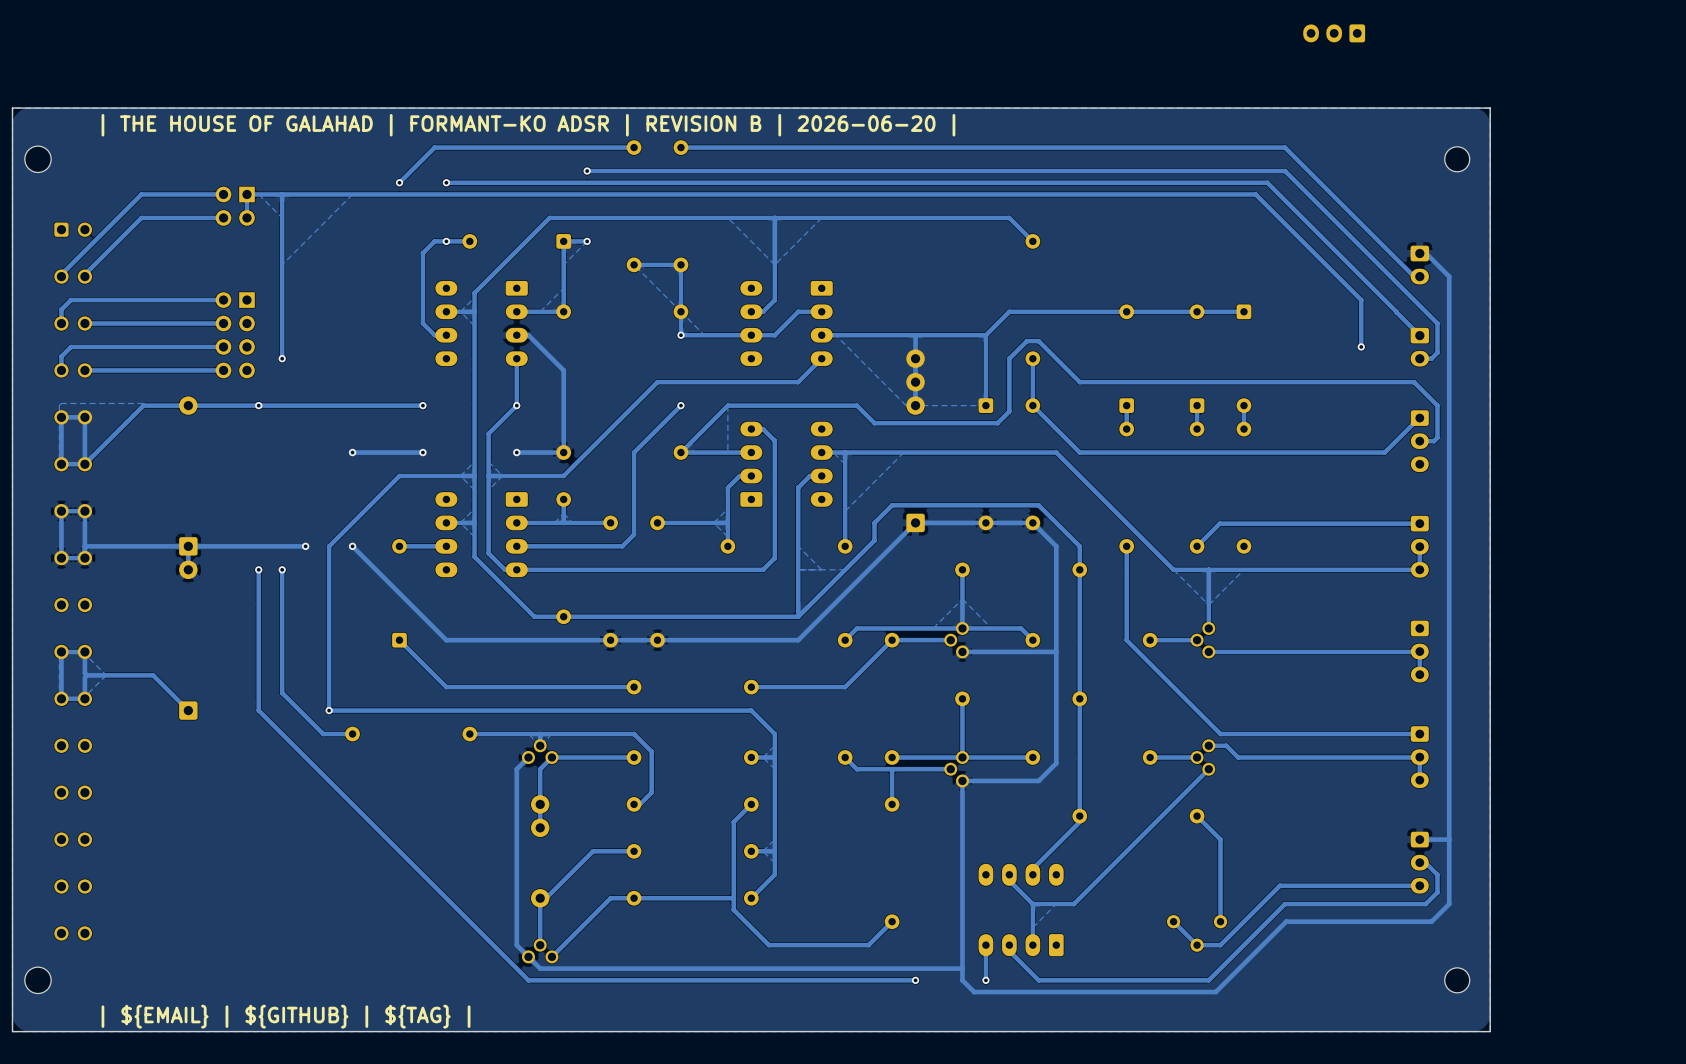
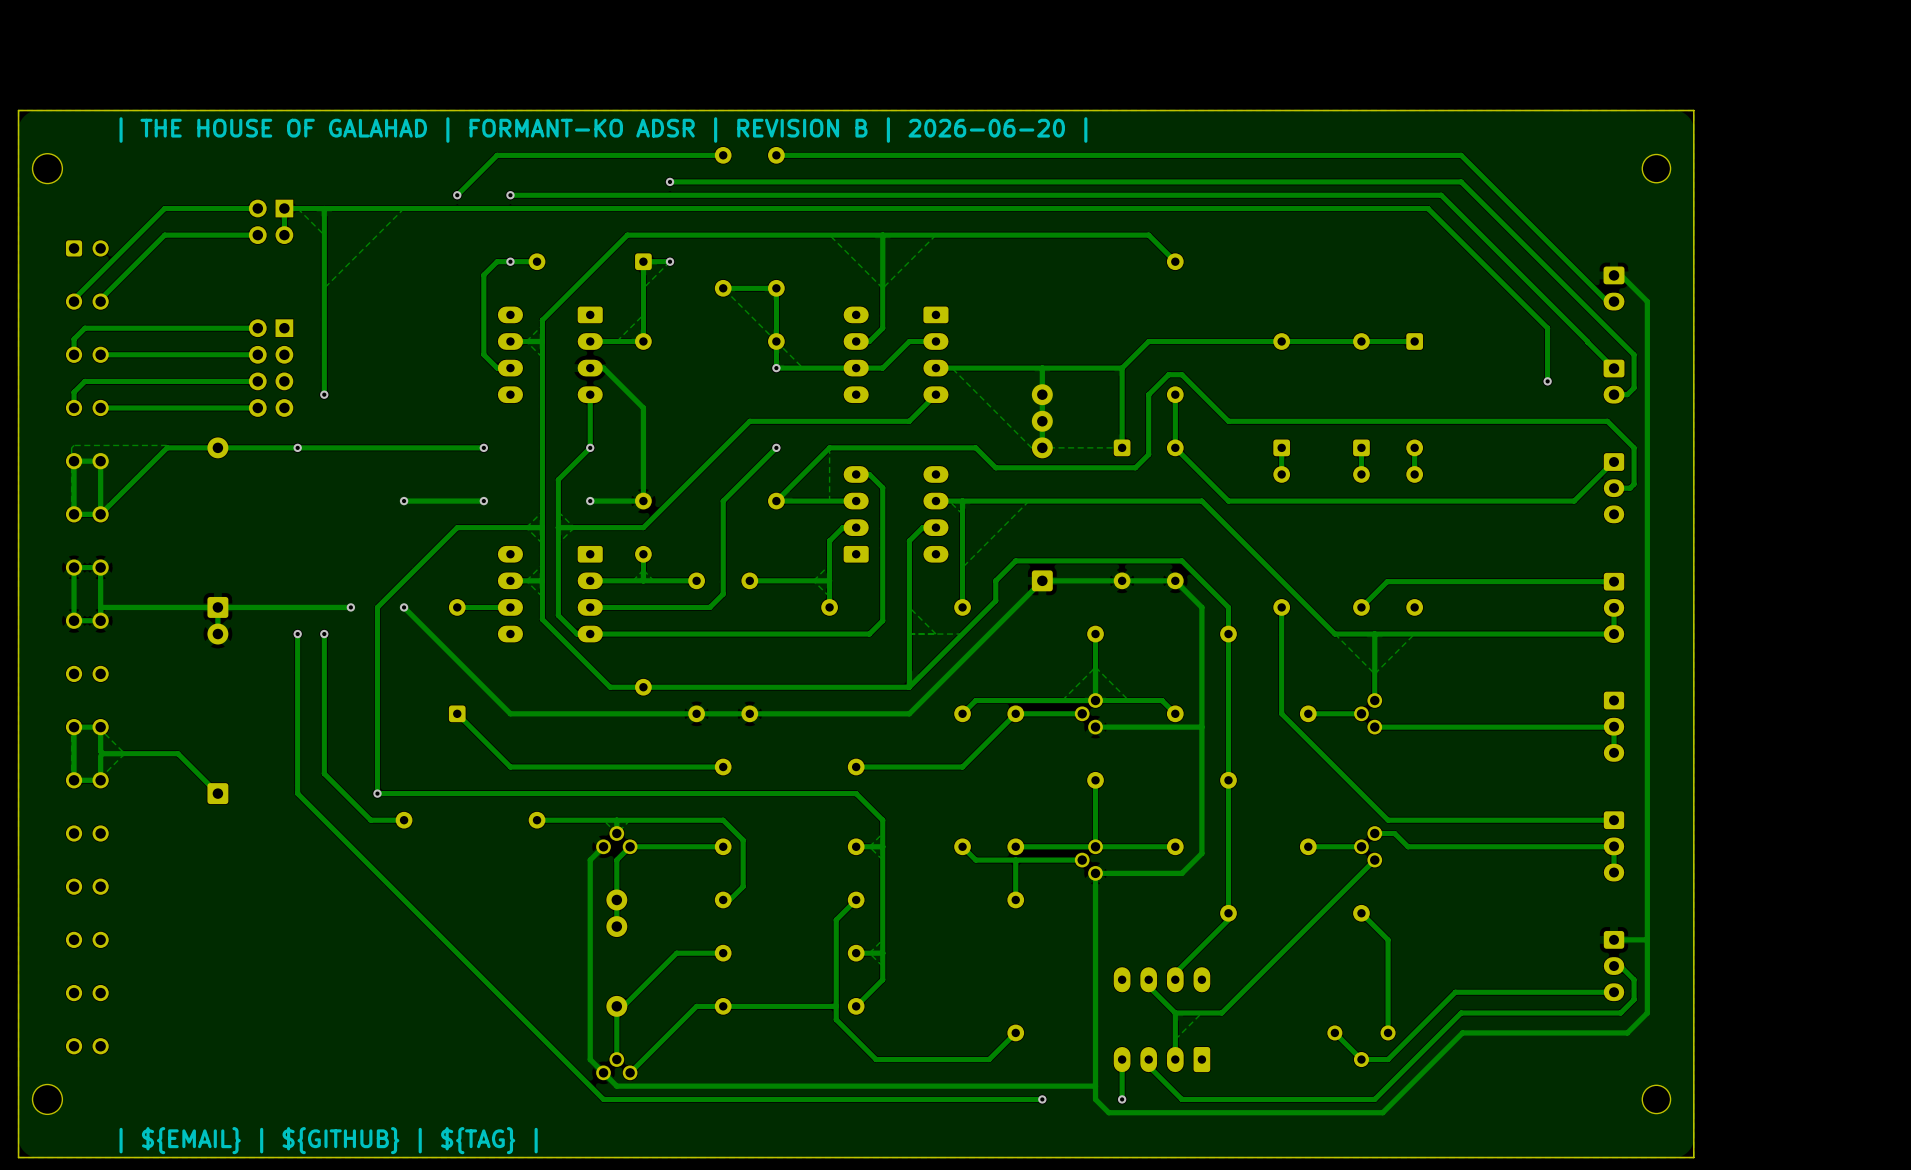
part: (1334, 33) -> none

